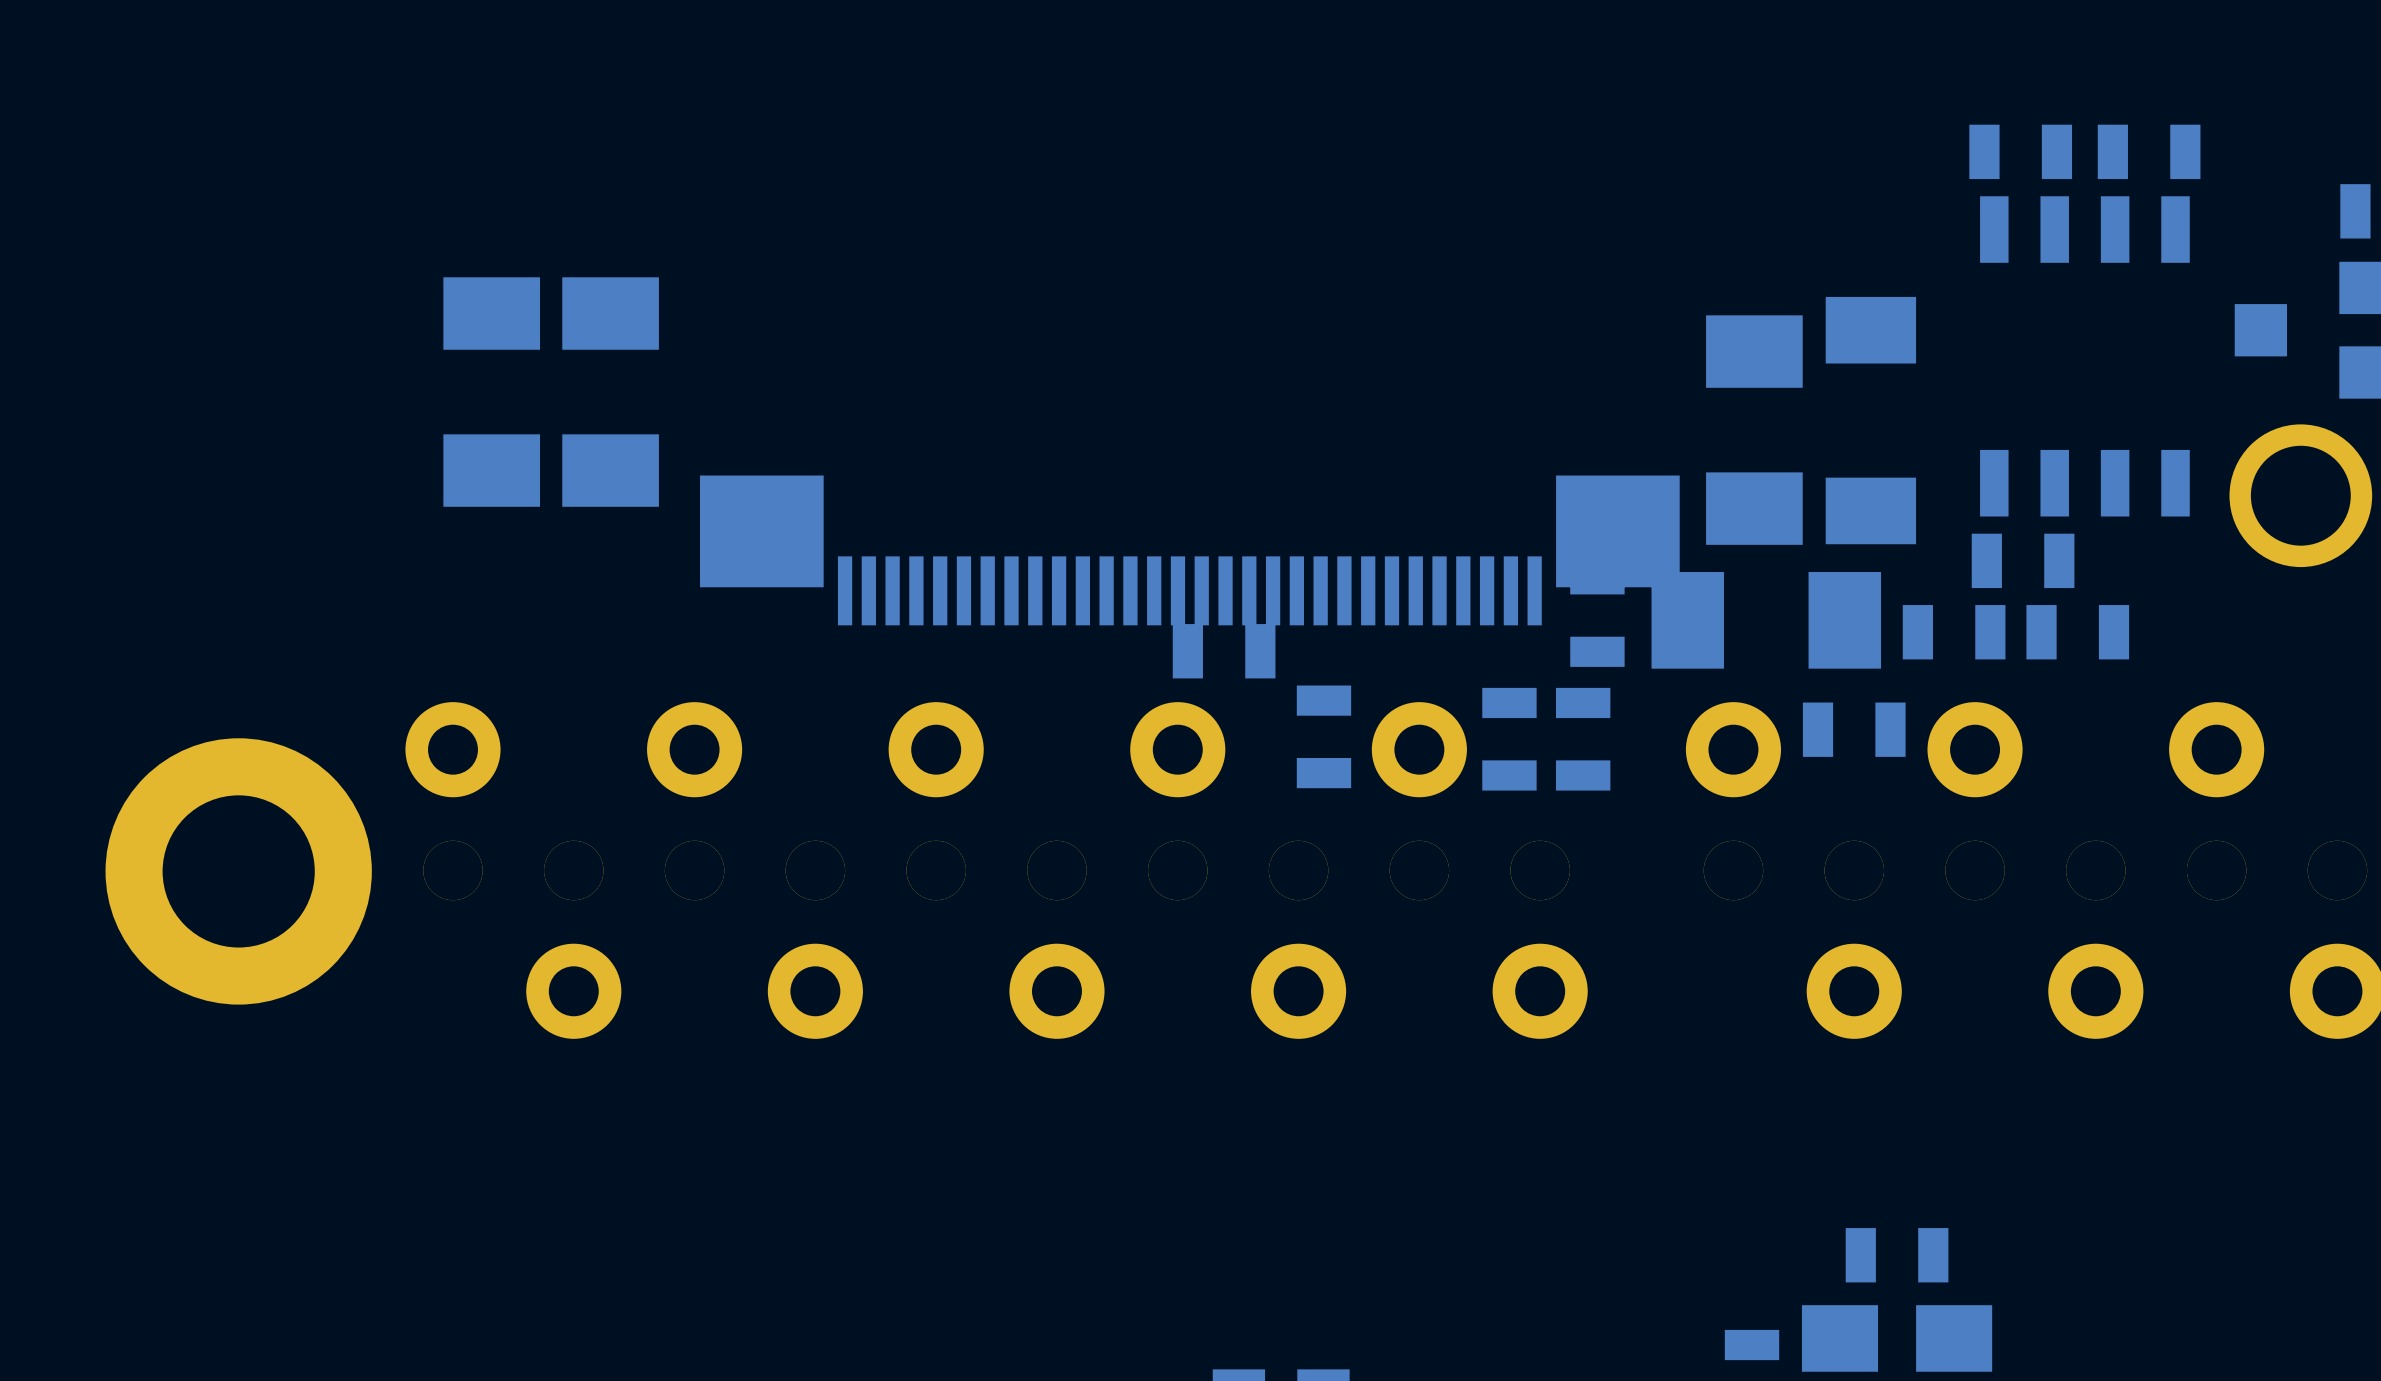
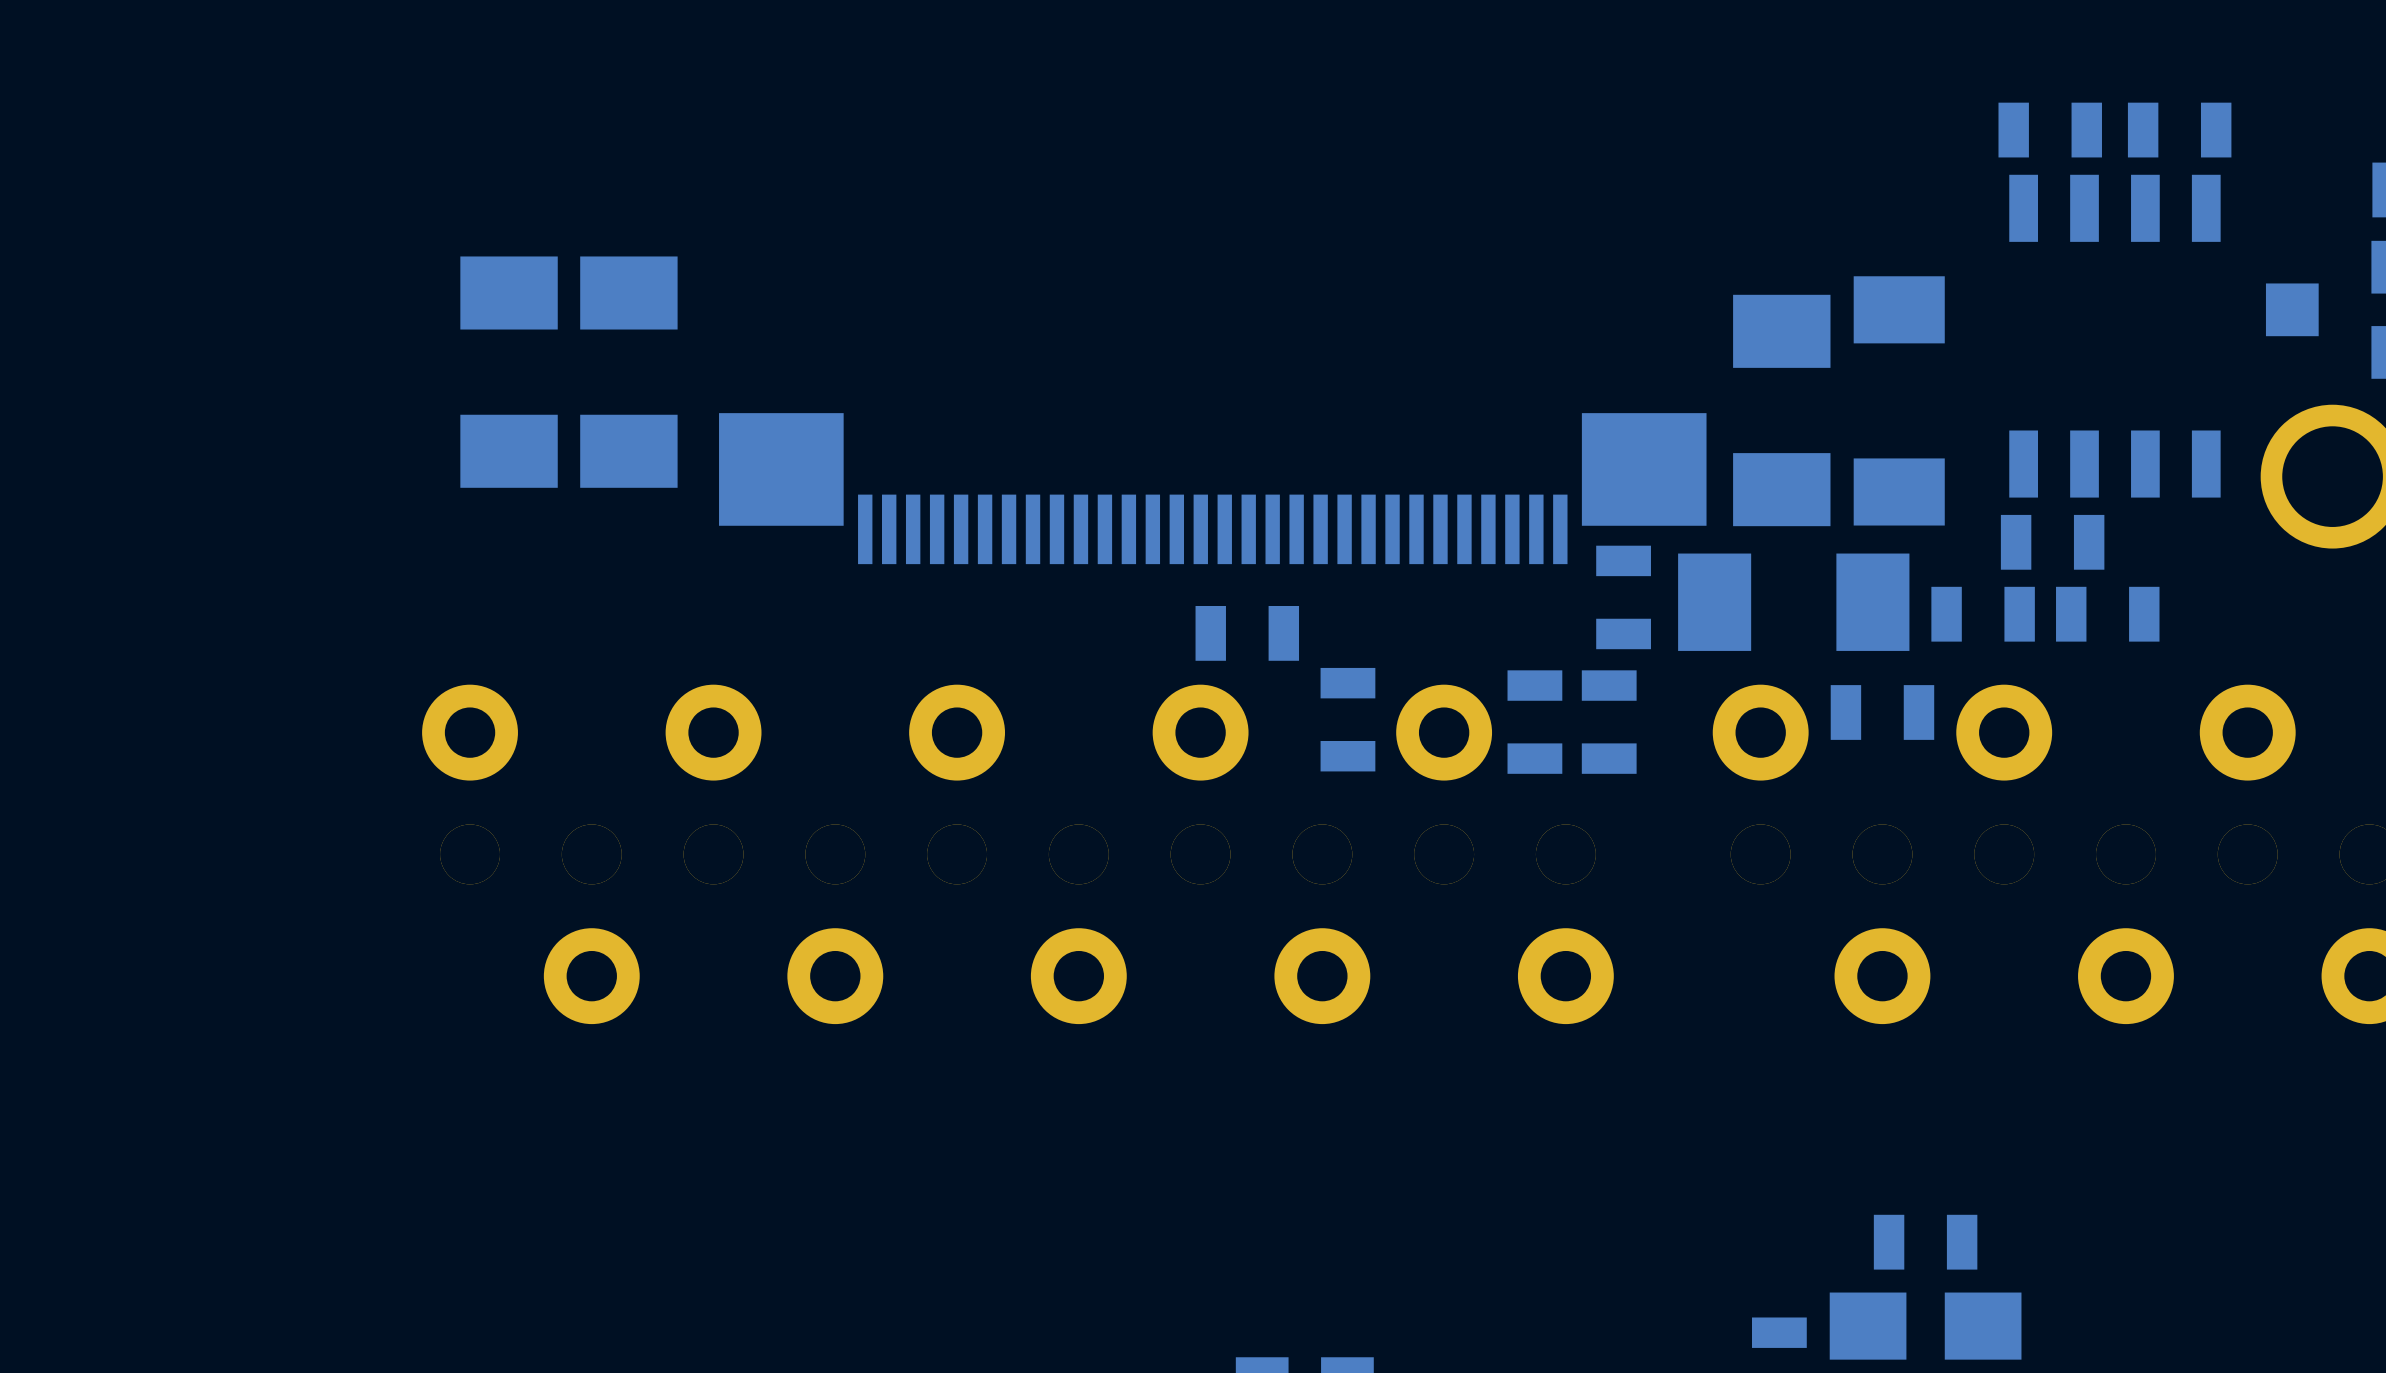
part position: (1189, 550) -> (1212, 488)
part: (238, 871) -> none

